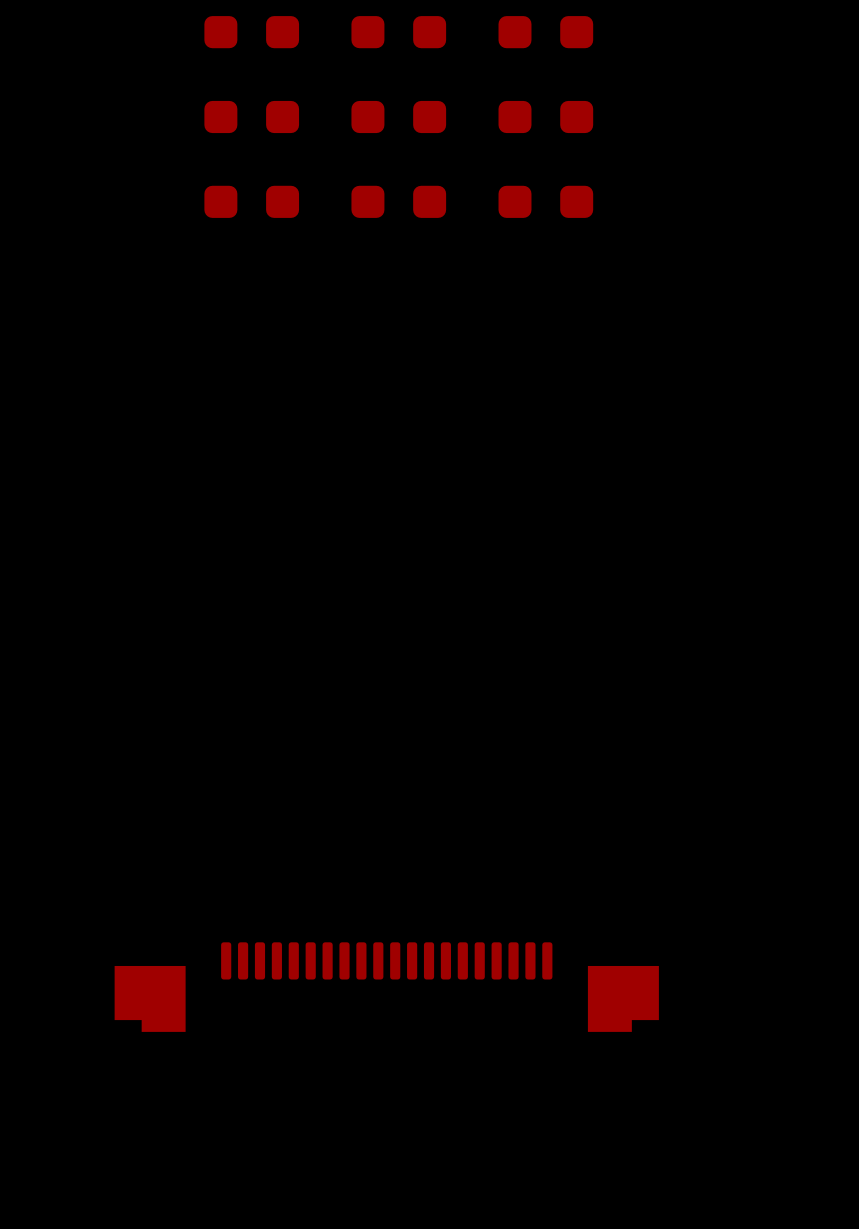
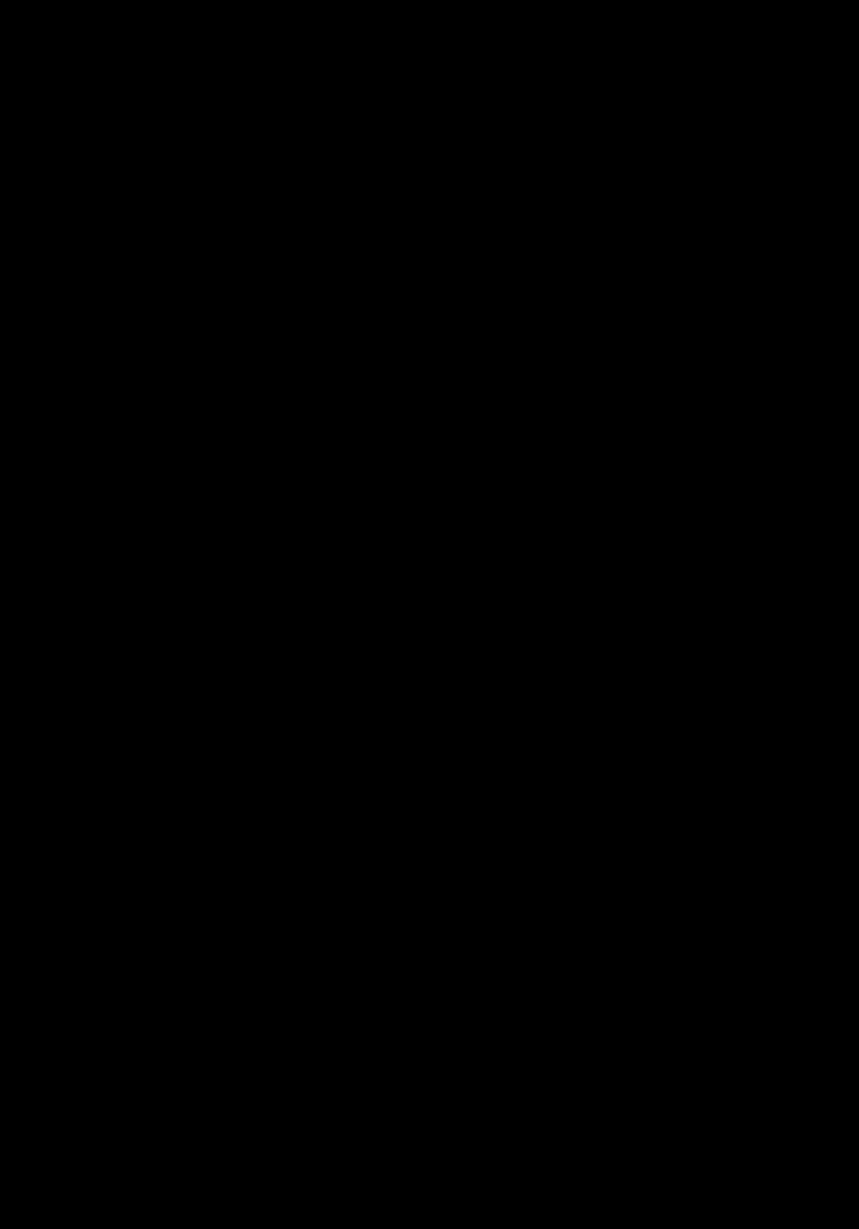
part: (251, 32) -> none
part: (398, 32) -> none
part: (545, 32) -> none
part: (251, 117) -> none
part: (398, 117) -> none
part: (545, 117) -> none
part: (251, 201) -> none
part: (398, 201) -> none
part: (545, 201) -> none
part: (386, 987) -> none

